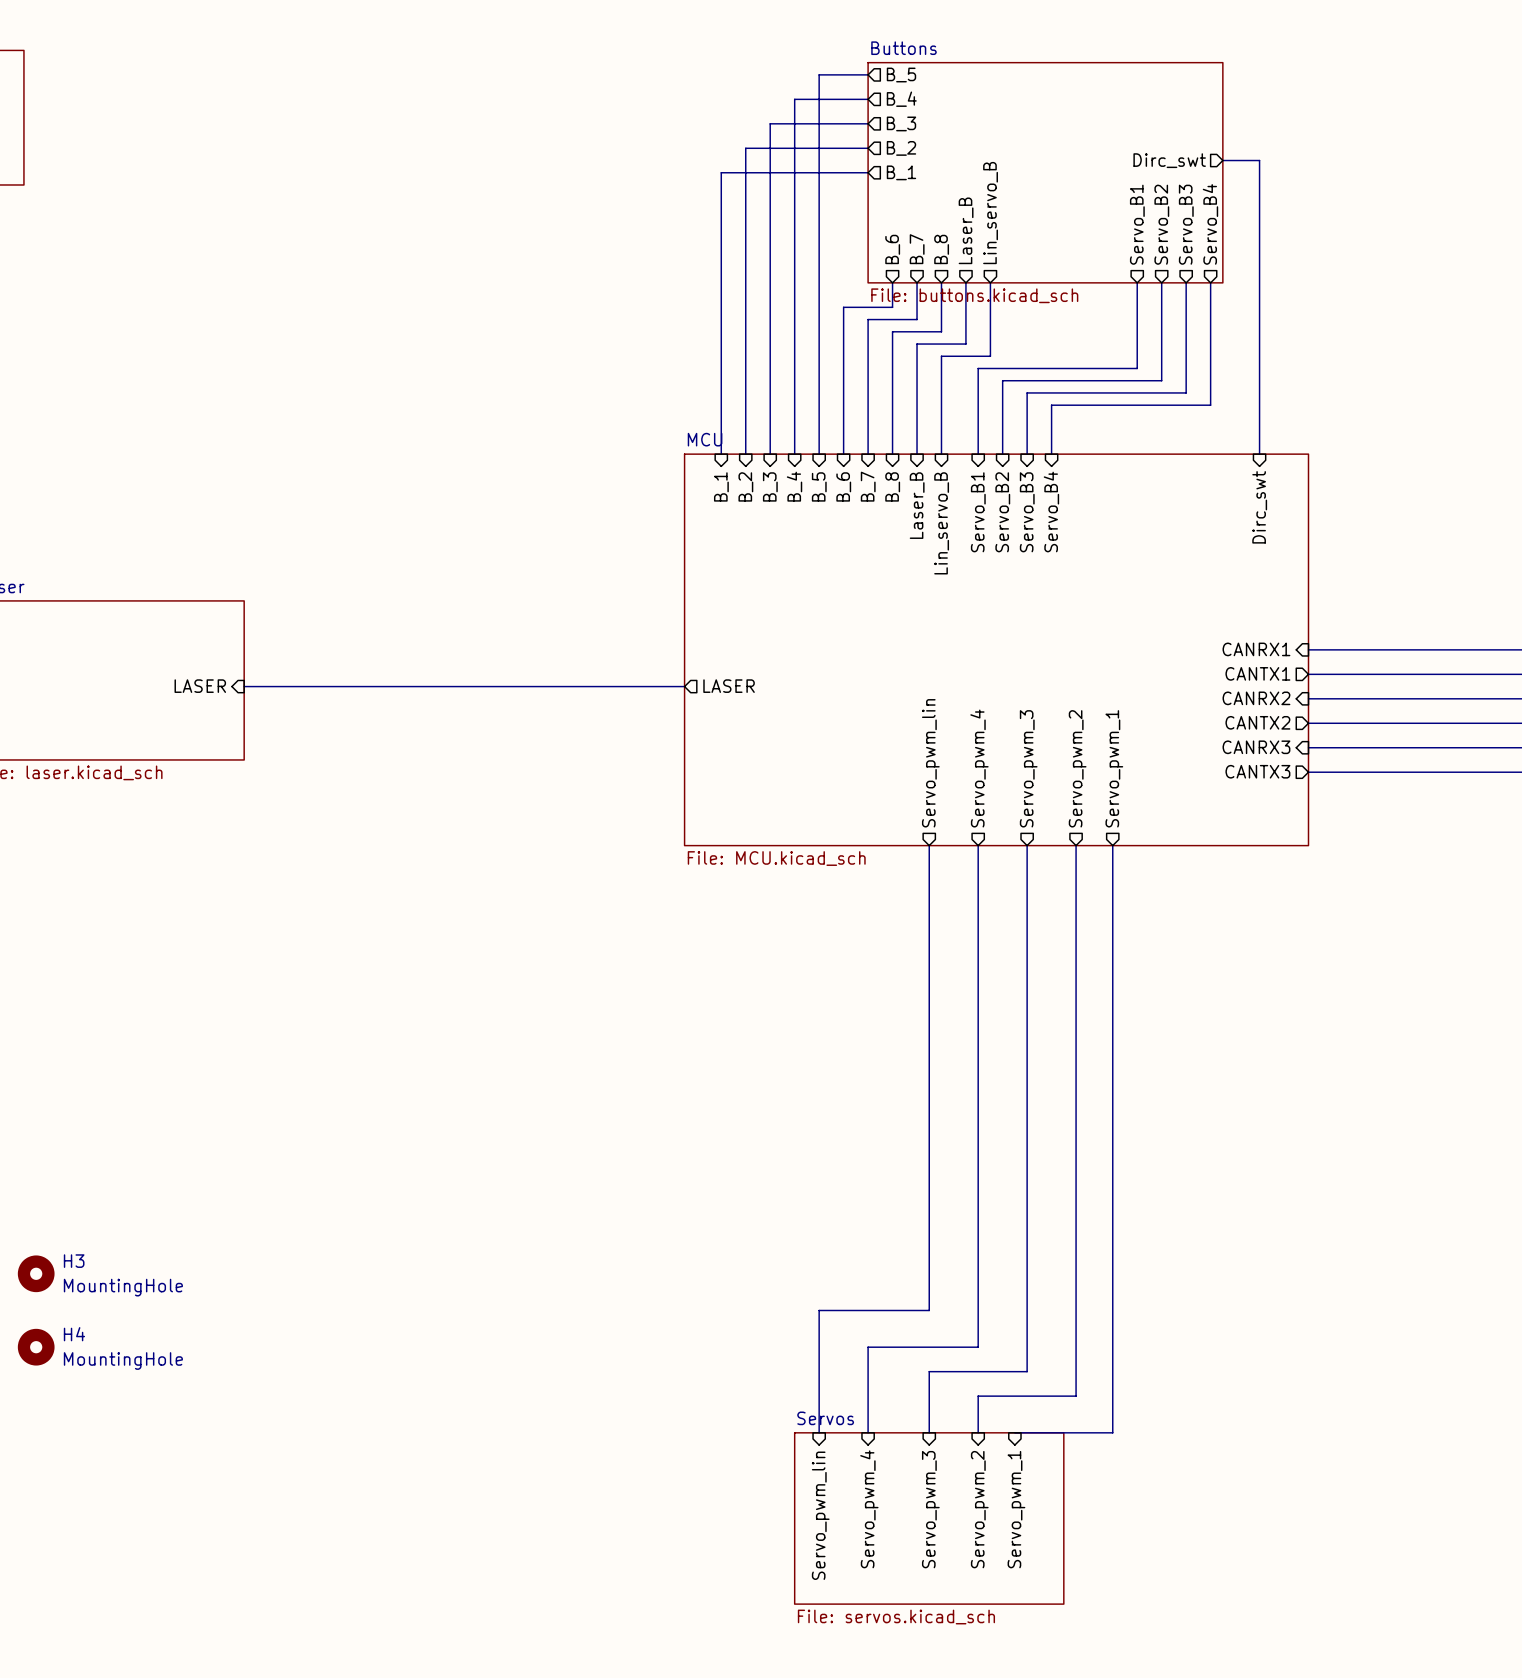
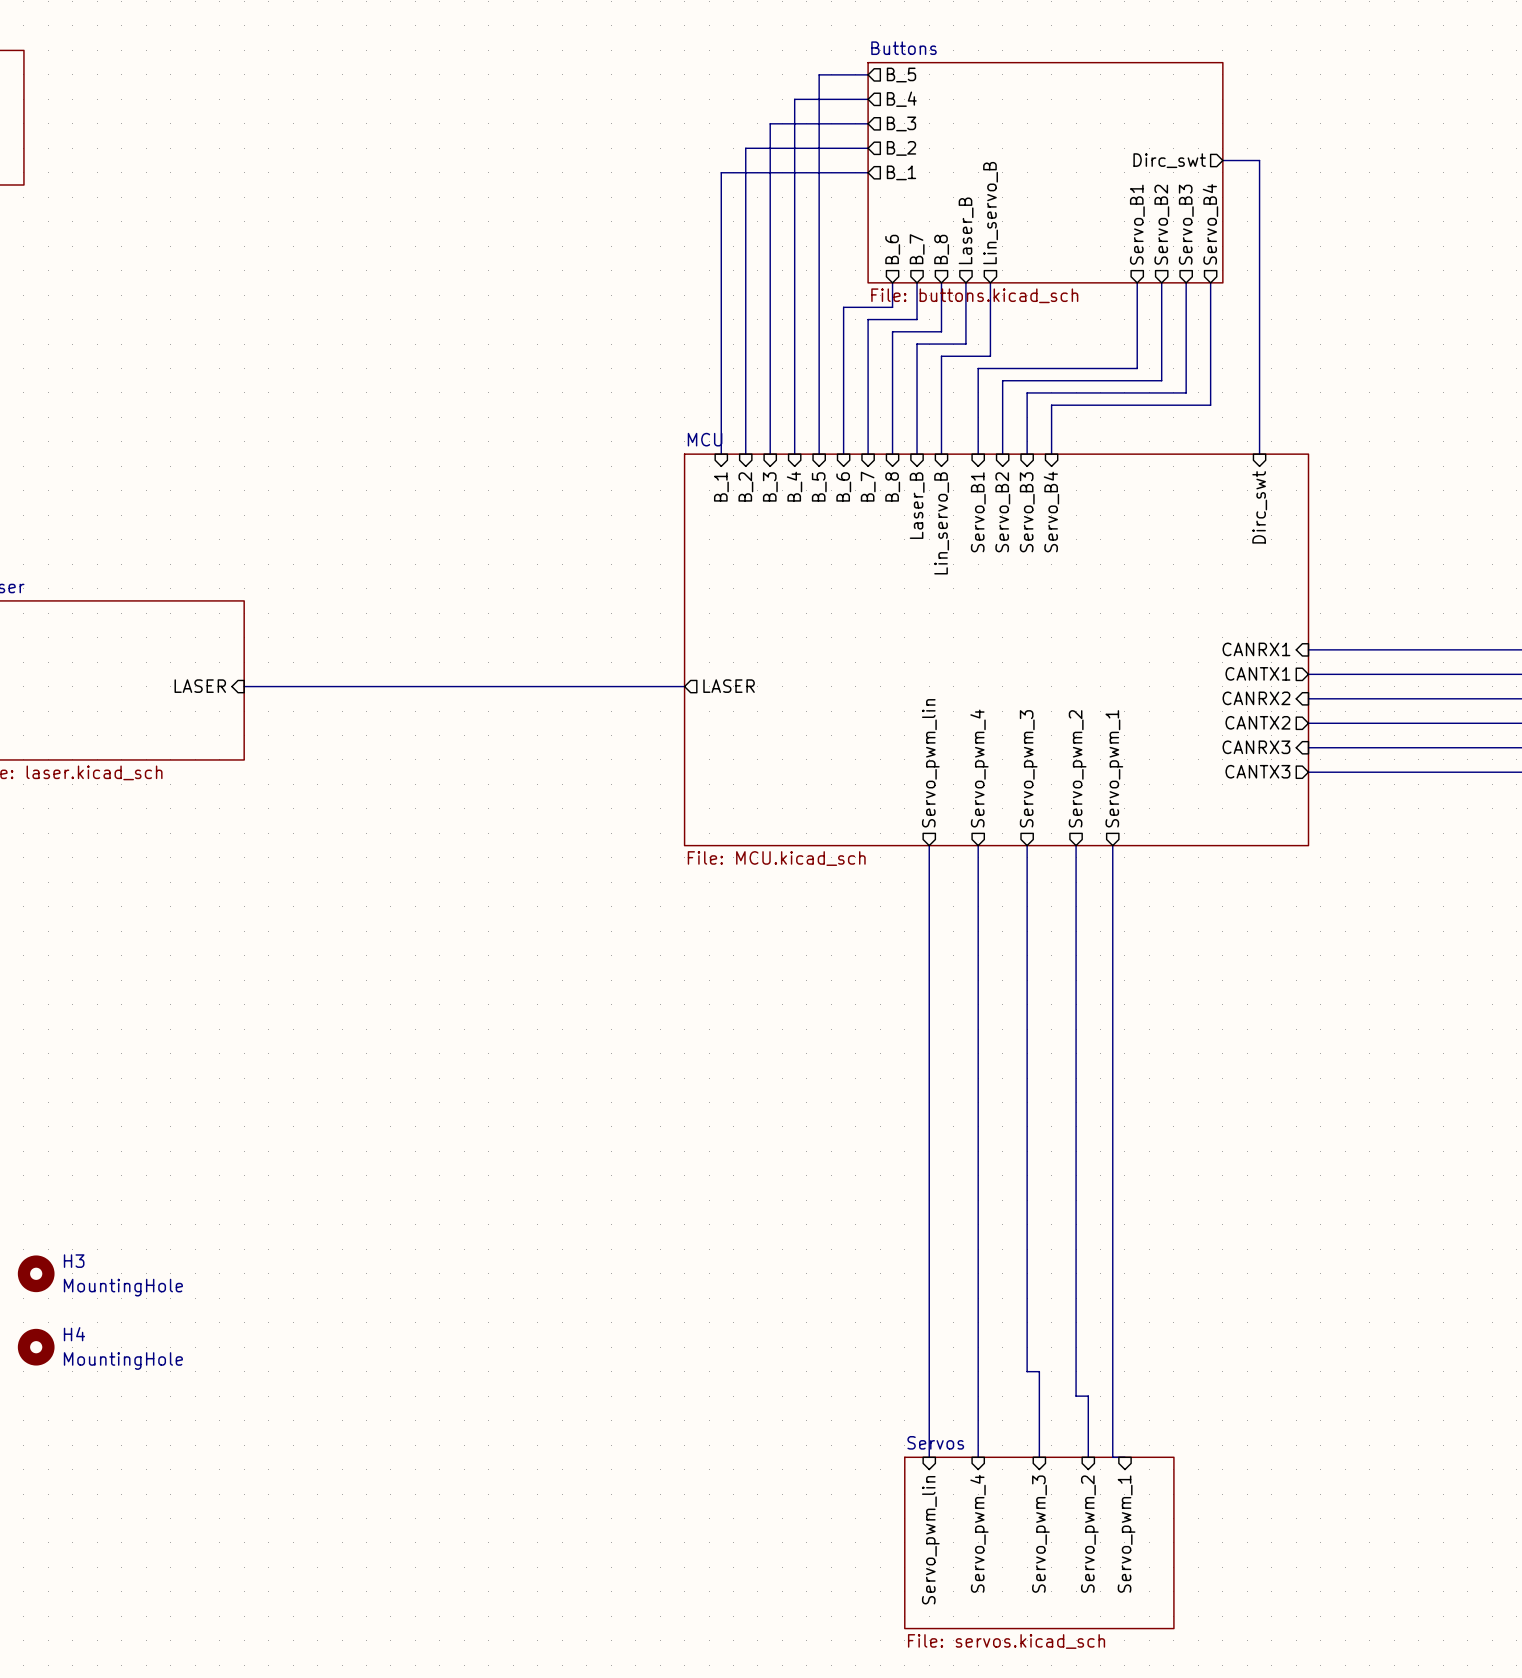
wire: (929, 1310) (819, 1310) (819, 1432) -> none
wire: (978, 1347) (868, 1347) (868, 1432) -> none
wire: (929, 1371) (1027, 1371) -> (929, 1371) (929, 1310)
wire: none -> (1027, 1371) (1039, 1371) (1039, 1457)
wire: (978, 1396) (1076, 1396) -> (978, 1396) (978, 1347)
wire: none -> (1076, 1396) (1088, 1396) (1088, 1457)
wire: none -> (929, 1432) (929, 1457)
wire: none -> (978, 1432) (978, 1457)
wire: (1014, 1432) (1112, 1432) -> (1124, 1457) (1112, 1457) (1112, 1432)
sheet pin position: Servo_pwm_4 (869, 1509) -> Servo_pwm_4 (979, 1533)
sheet pin position: Servo_pwm_3 (930, 1509) -> Servo_pwm_3 (1040, 1534)
sheet pin position: Servo_pwm_2 (979, 1509) -> Servo_pwm_2 (1089, 1534)
sheet pin position: Servo_pwm_1 (1016, 1509) -> Servo_pwm_1 (1126, 1534)
sheet pin position: Servo_pwm_lin (820, 1515) -> Servo_pwm_lin (930, 1540)
sheet Servos position: (929, 1518) -> (1039, 1542)

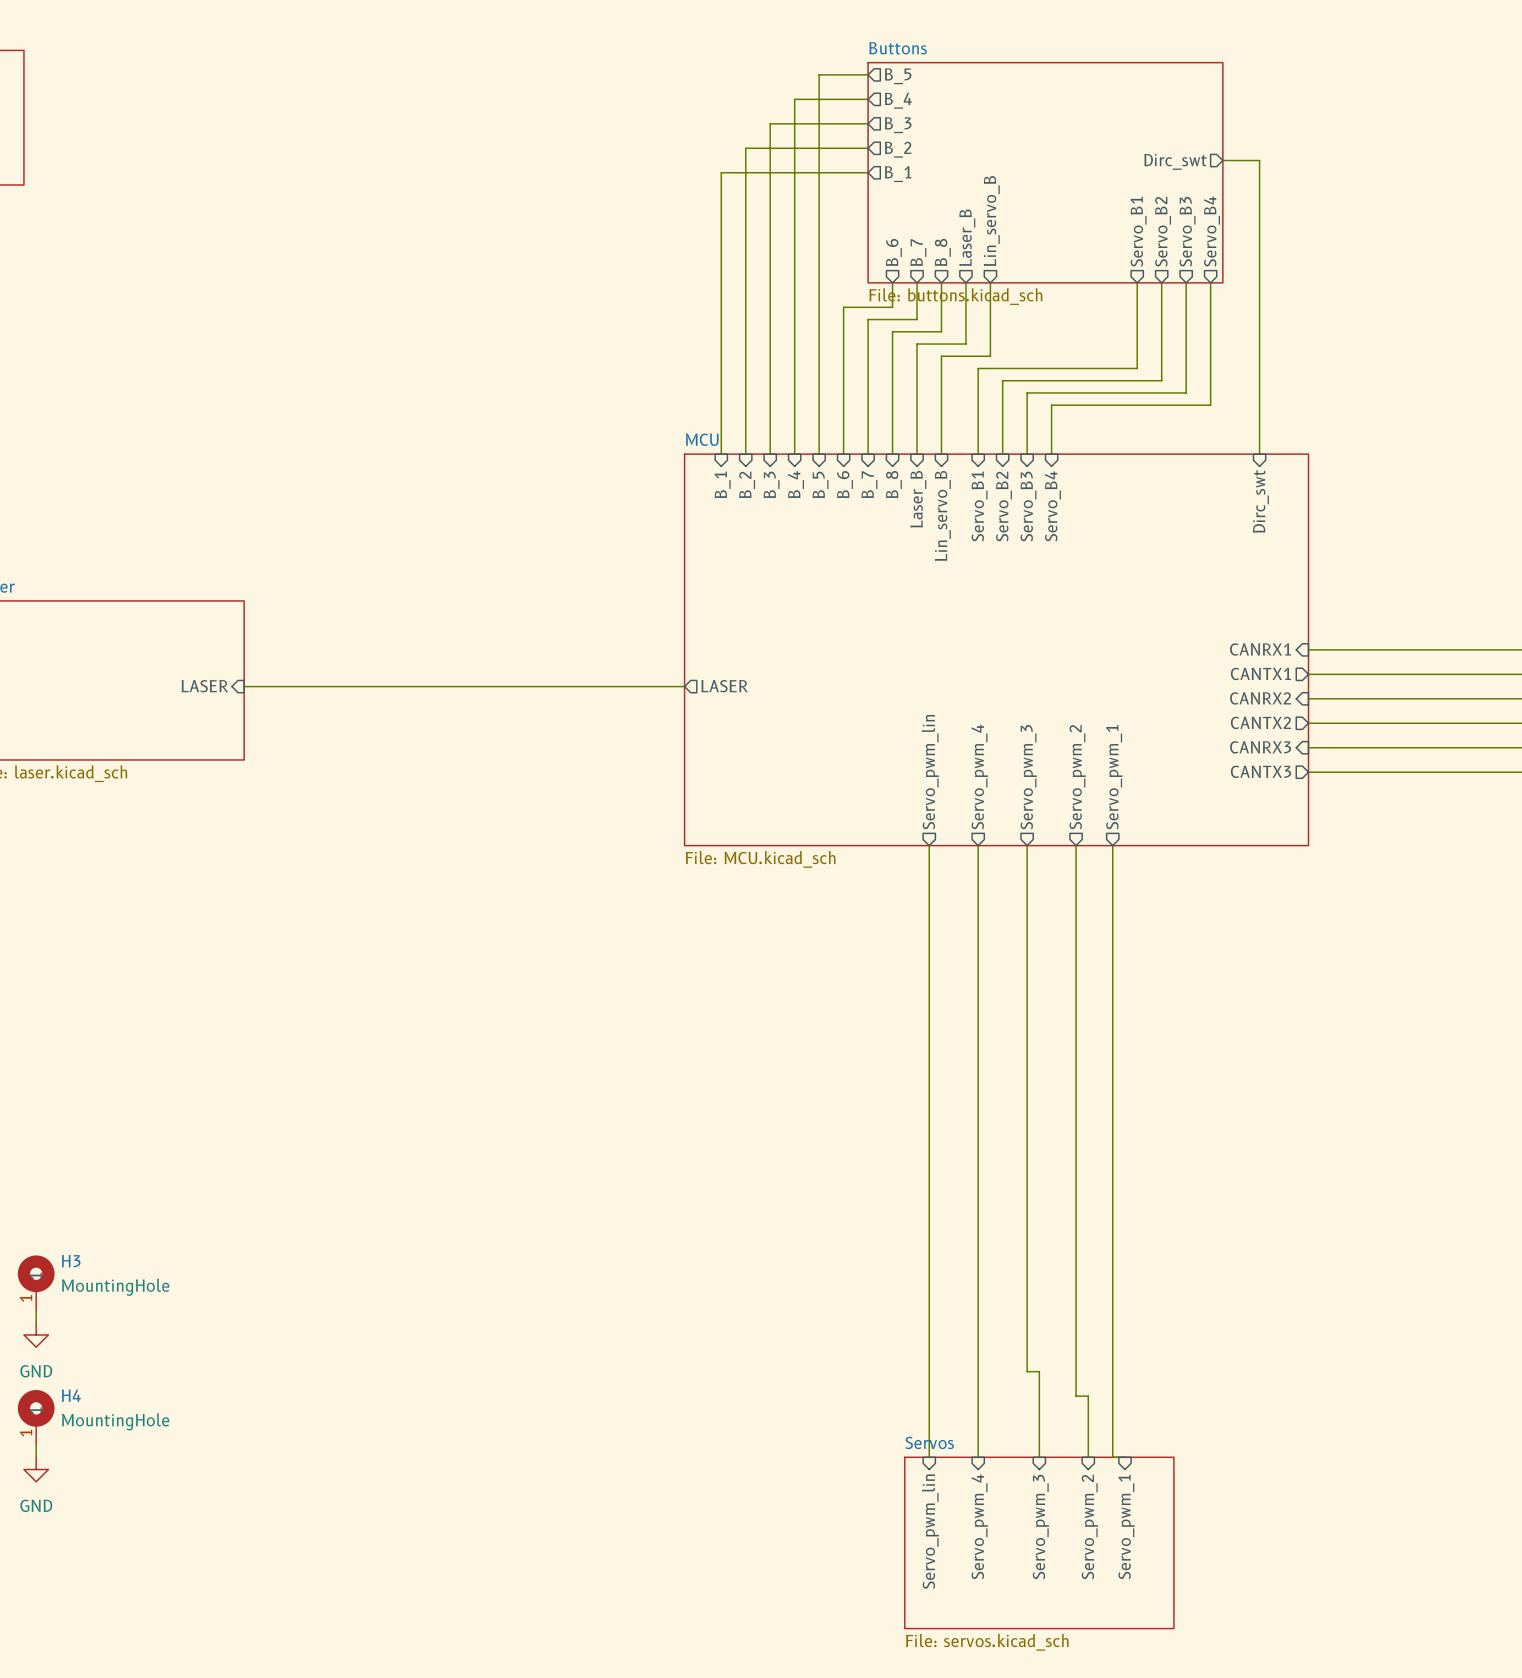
H3 symbol: [17, 1255, 55, 1293] -> [17, 1255, 55, 1311]
wire: none -> (36, 1310) (36, 1322)
H4 symbol: [17, 1328, 55, 1366] -> [17, 1390, 55, 1446]
power symbol: none -> GND (36, 1334)
wire: none -> (36, 1445) (36, 1457)
power symbol: none -> GND (36, 1469)

